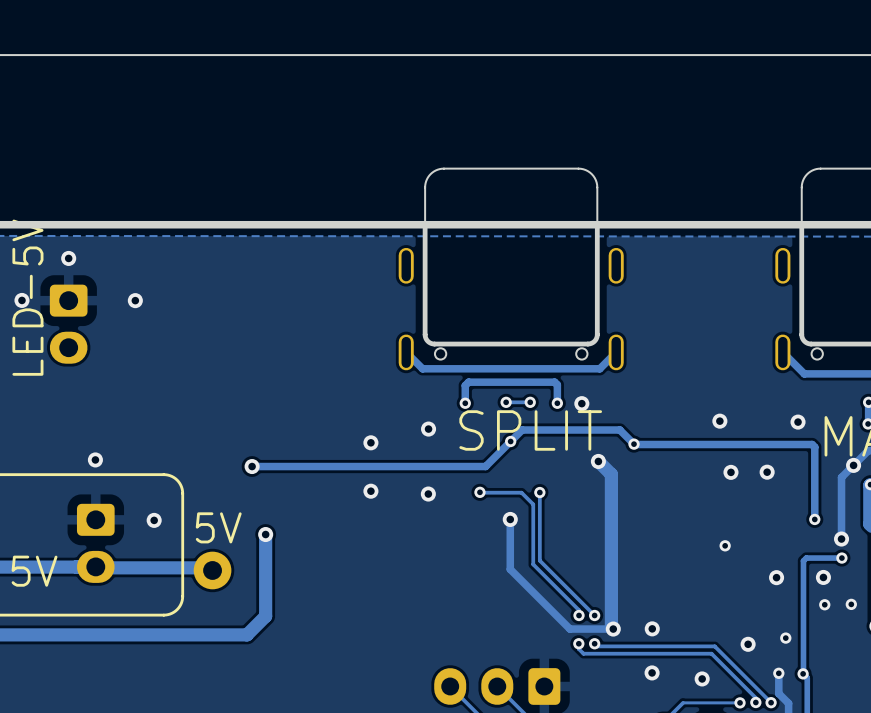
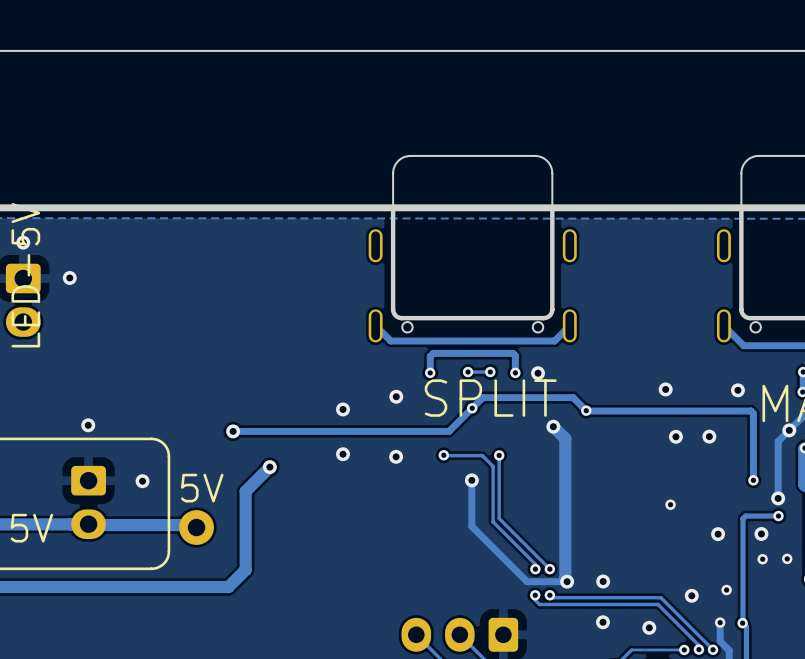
via: (68, 258) -> none
via: none -> (23, 242)
via: (21, 300) -> none
via: none -> (69, 277)
via: (135, 300) -> none
part position: (68, 324) -> (23, 300)
track: none -> (269, 467) (245, 491) (245, 494)
via position: (265, 534) -> (269, 467)

